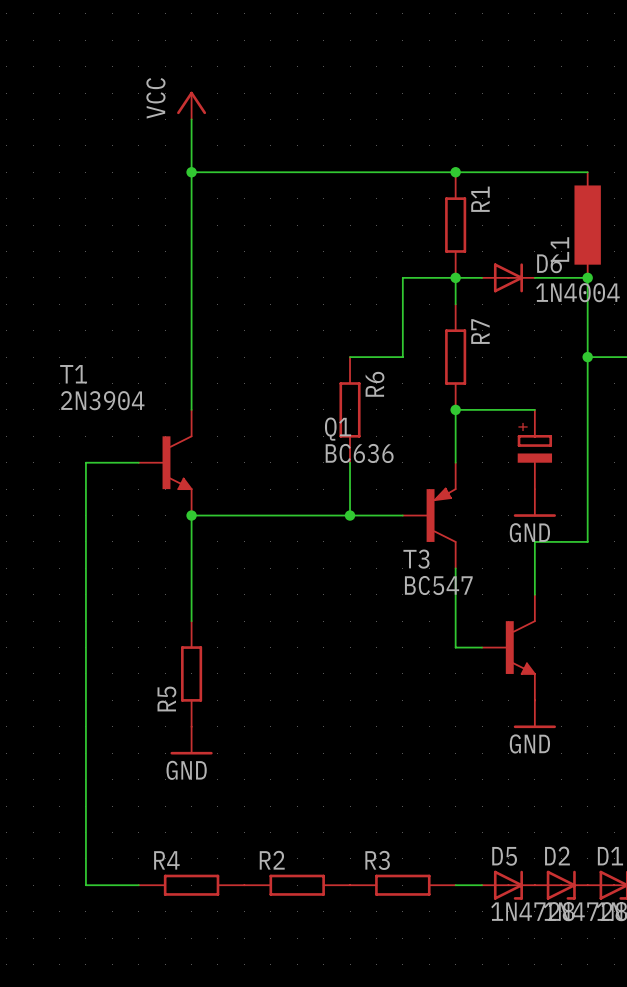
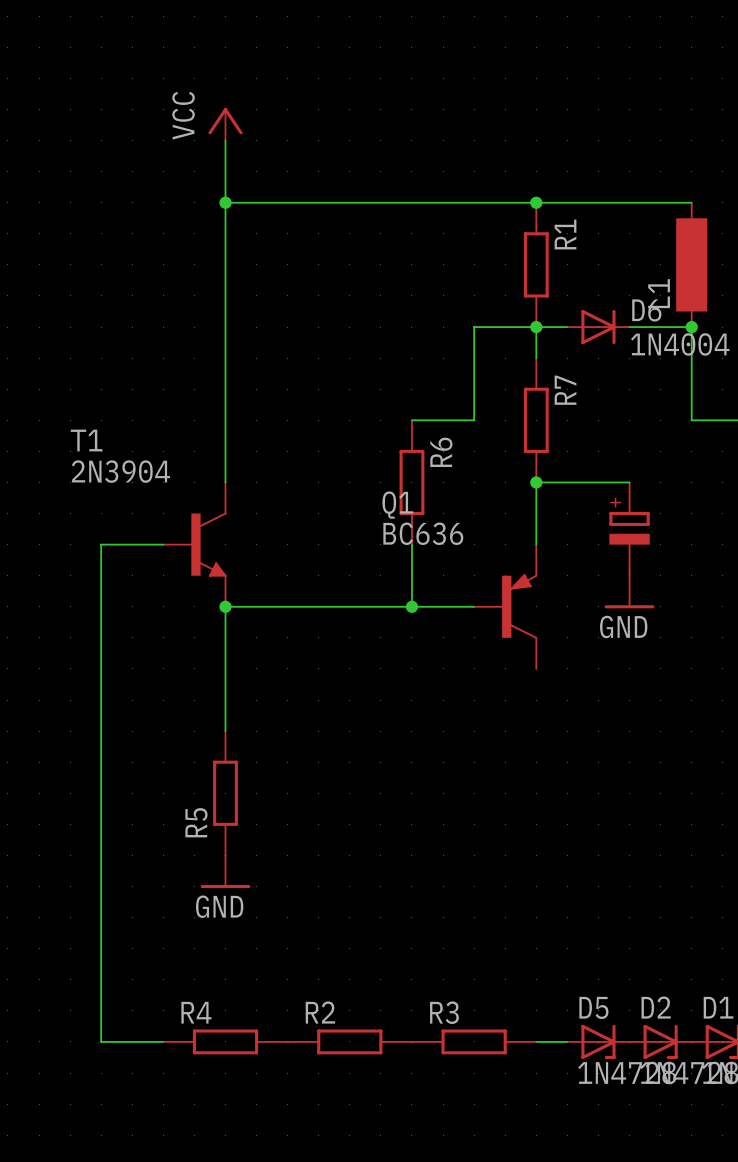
wire: (587, 357) (587, 541) (534, 541) (534, 594) -> none
junction: (587, 357) -> none
wire: (455, 568) (455, 647) (482, 647) -> none
T3: BC547 (508, 647) -> none
power symbol: GND (534, 714) -> none

